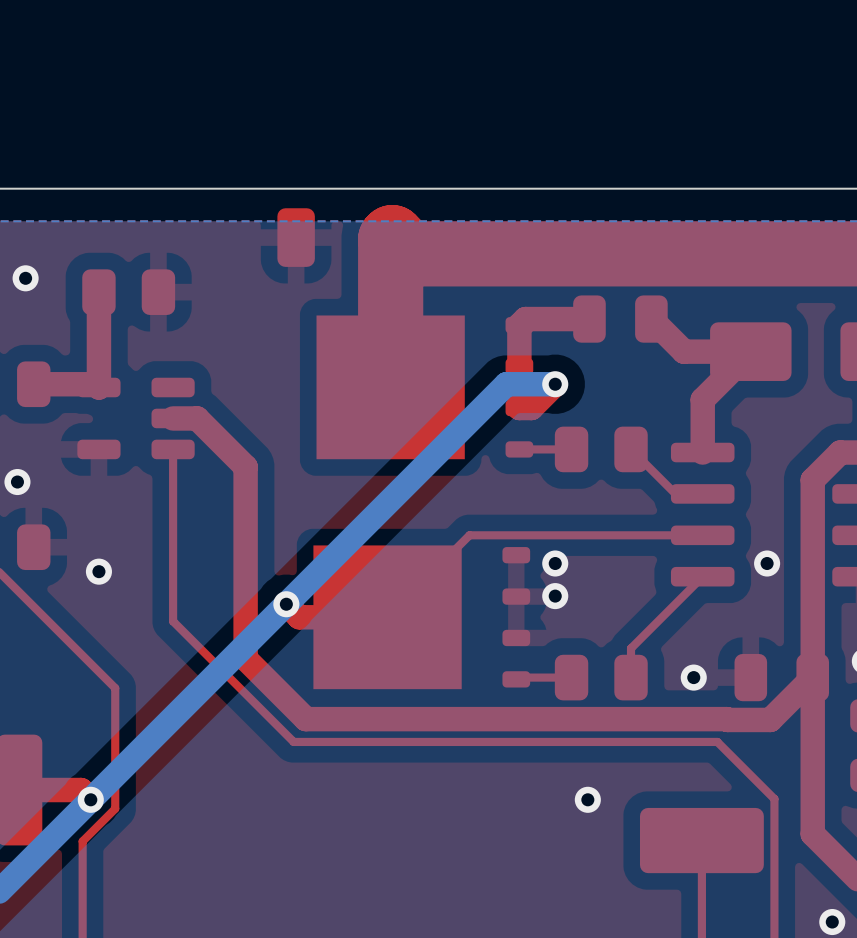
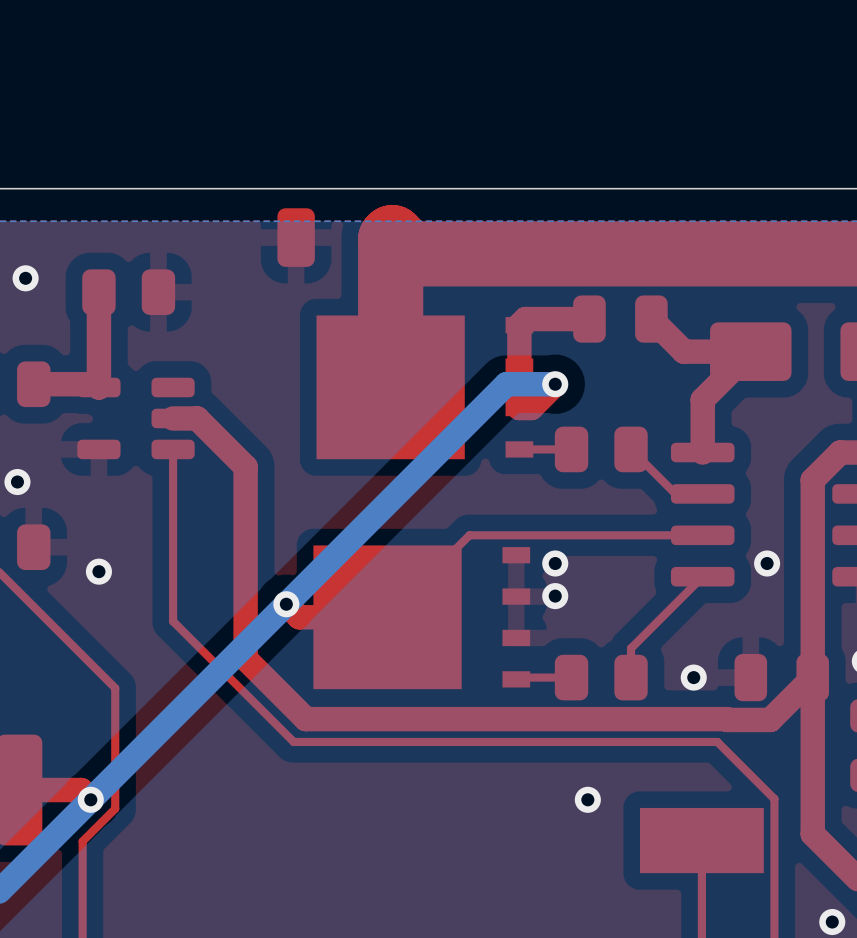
part footprint: [316, 315, 534, 460] -> [316, 315, 534, 460]
part footprint: [313, 545, 531, 690] -> [313, 545, 531, 690]
part footprint: [639, 807, 764, 874] -> [639, 807, 764, 874]

